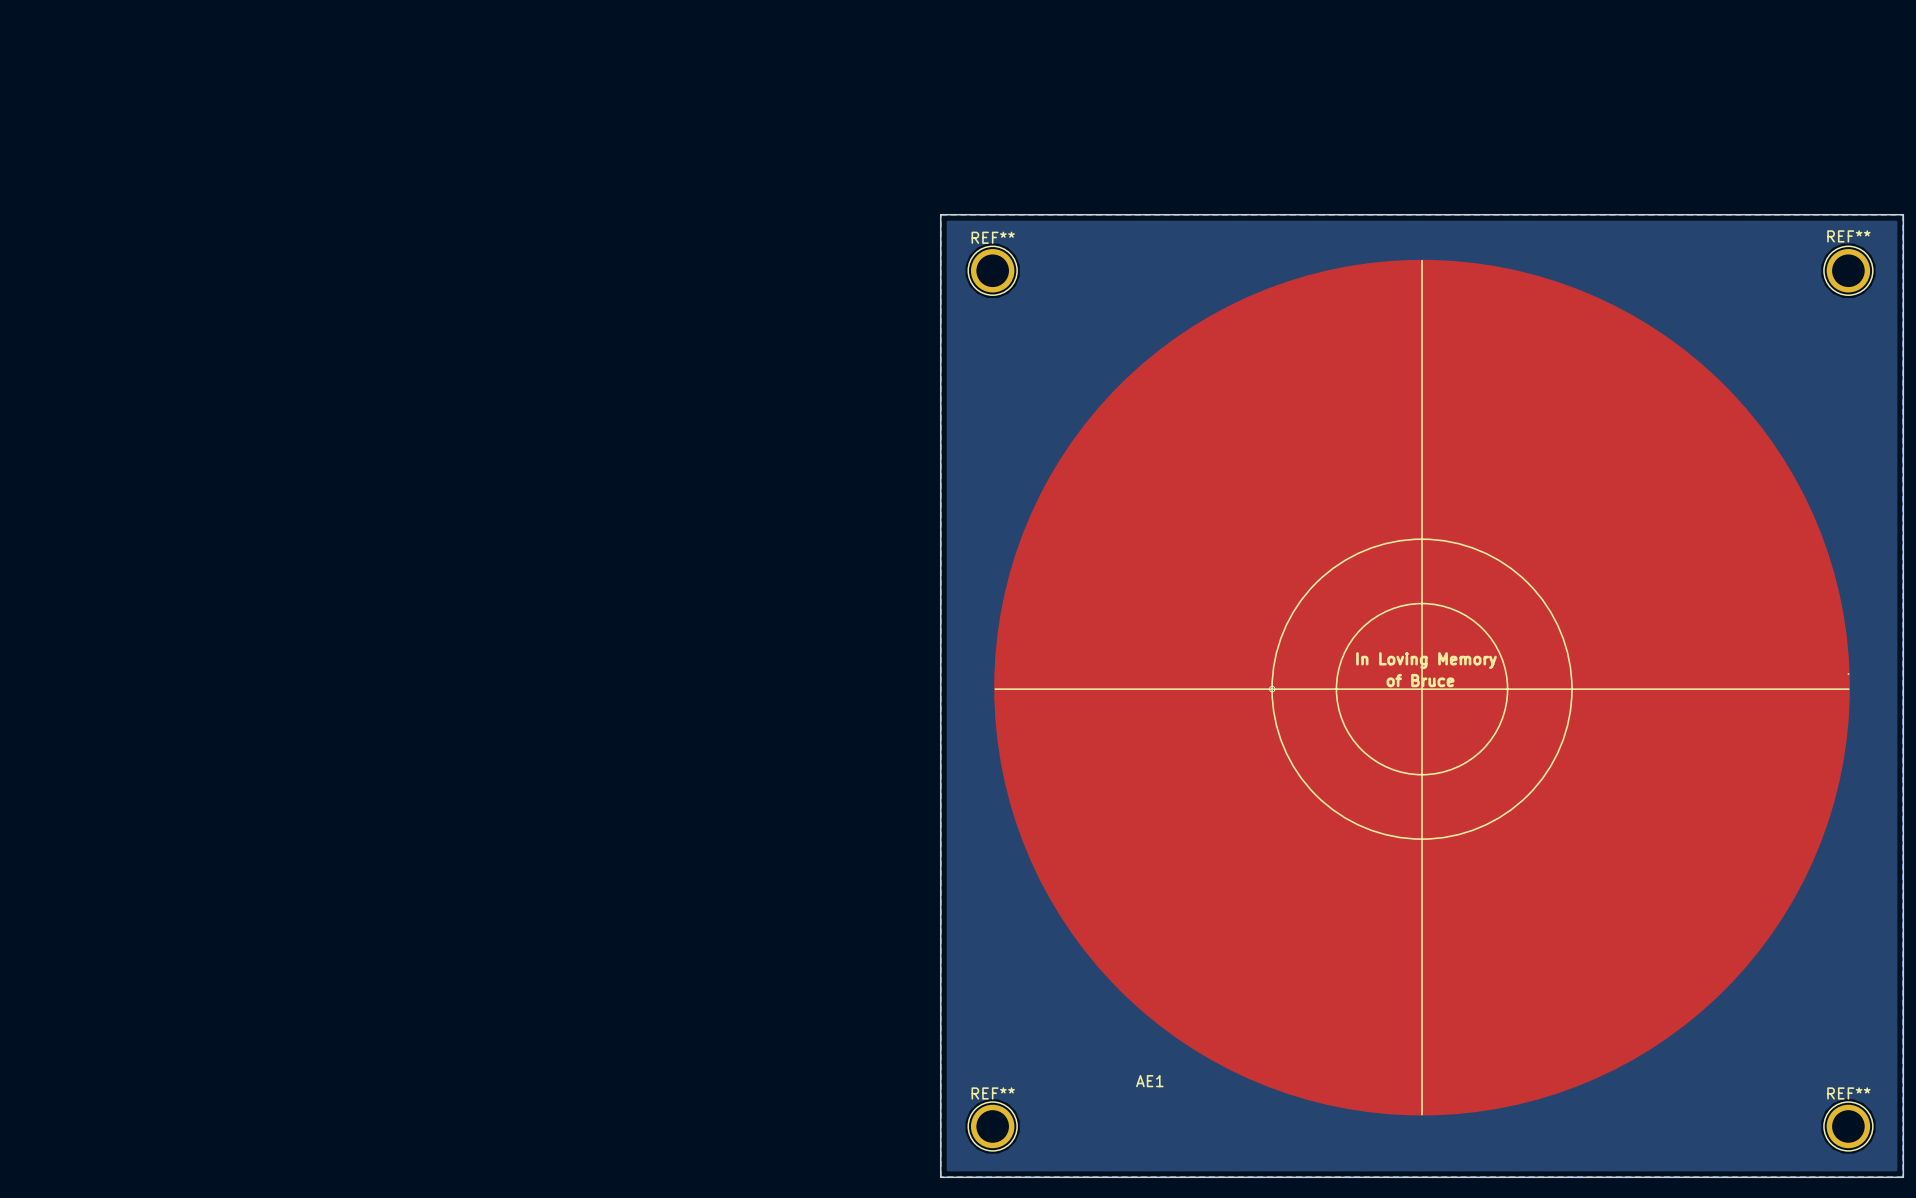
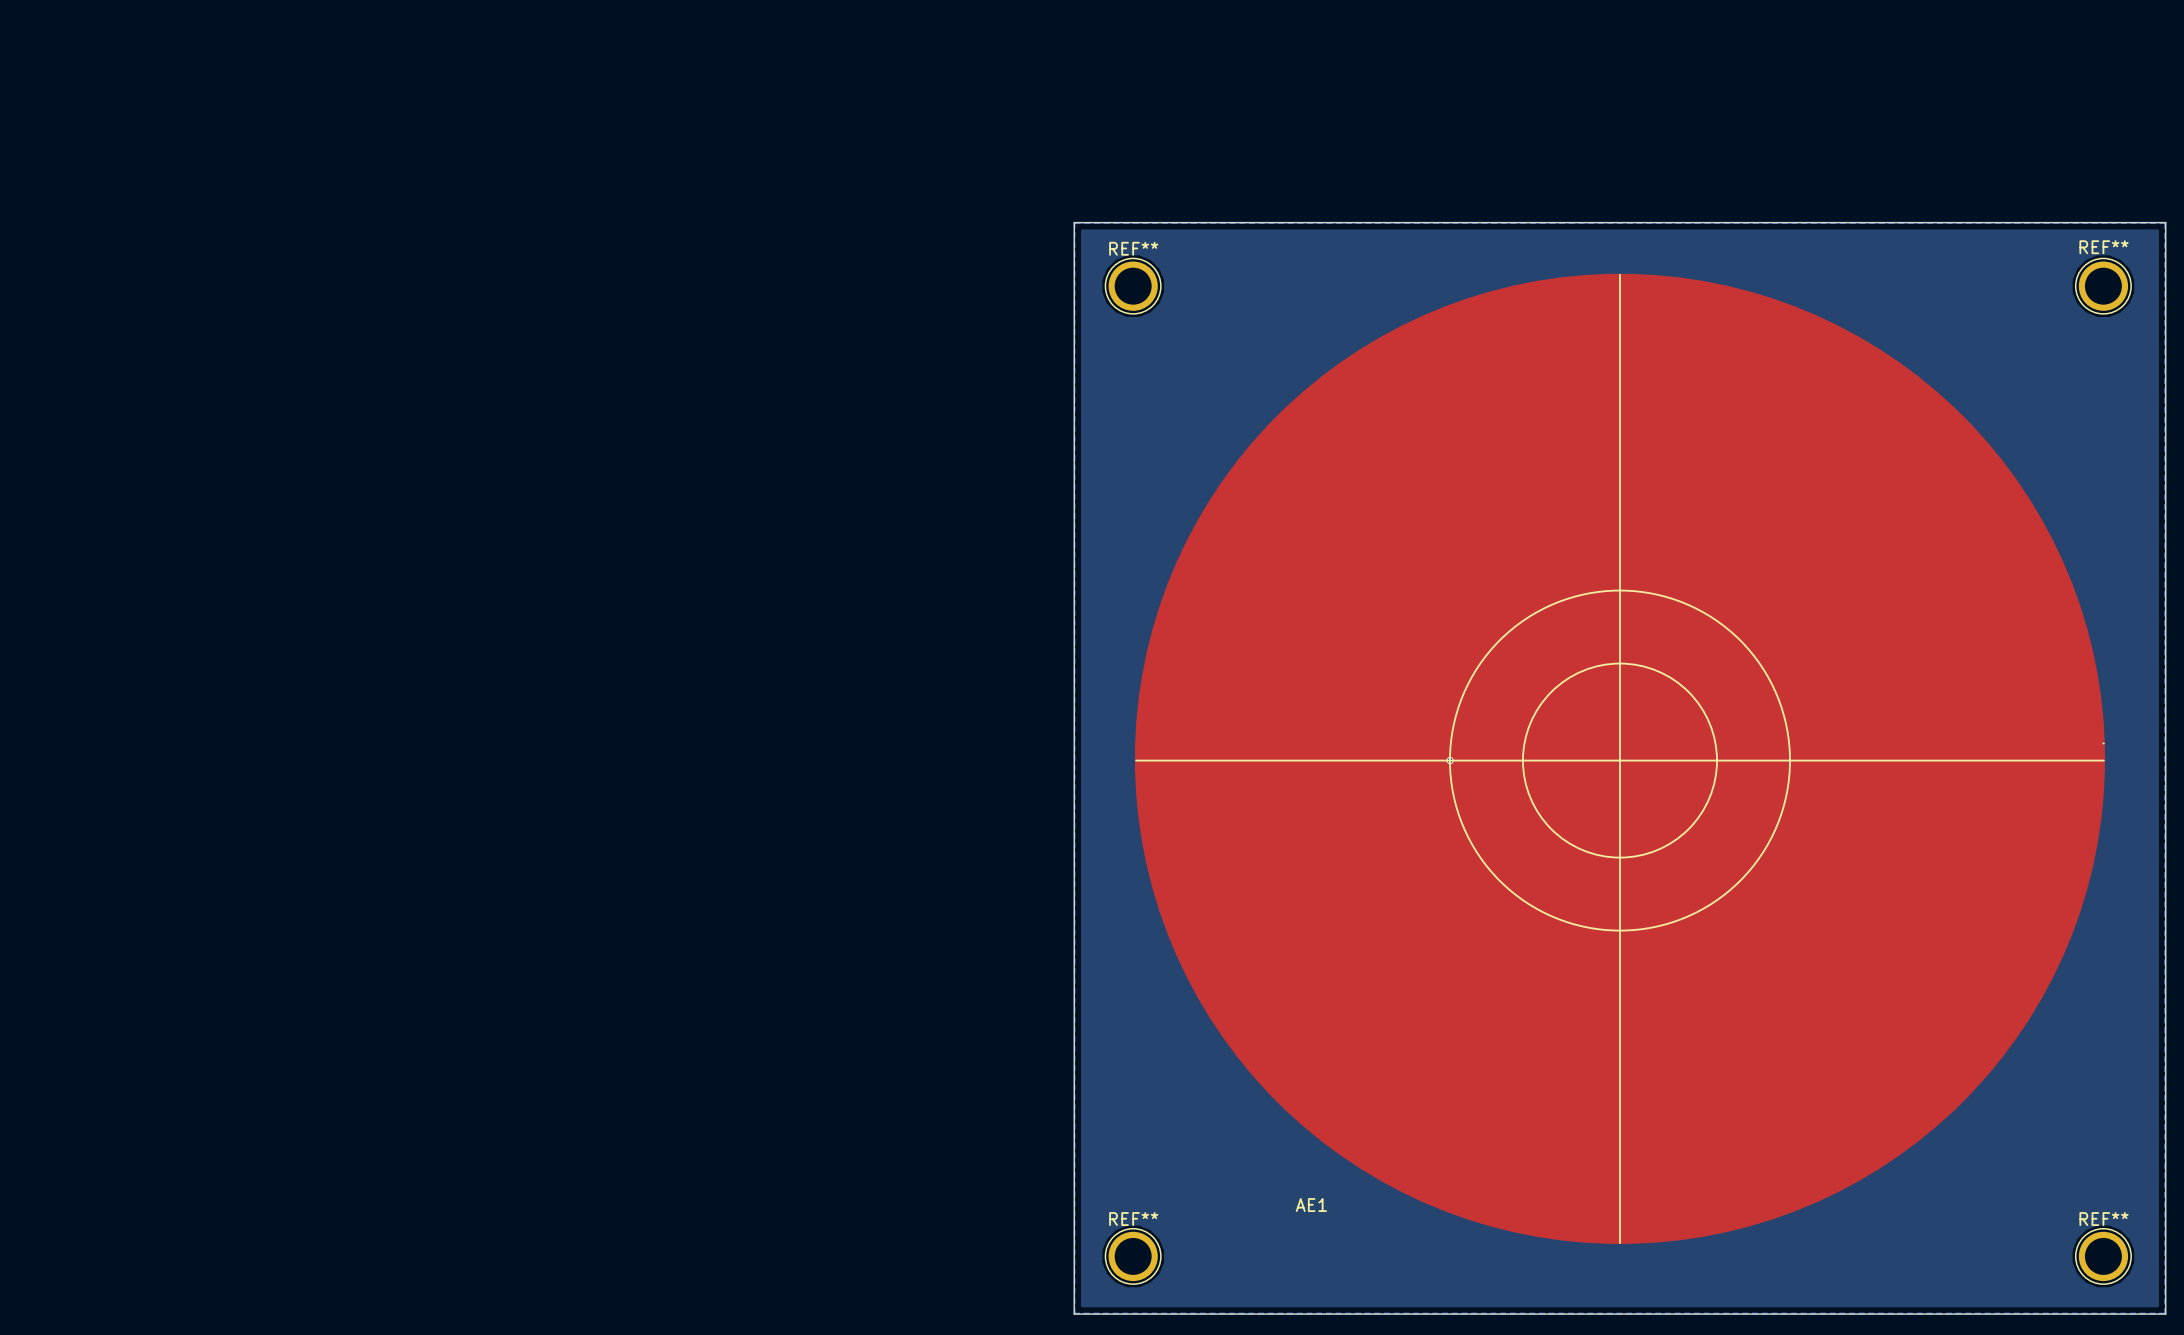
text: In Loving Memory (1426, 660) -> none
text: of Bruce (1420, 680) -> none

